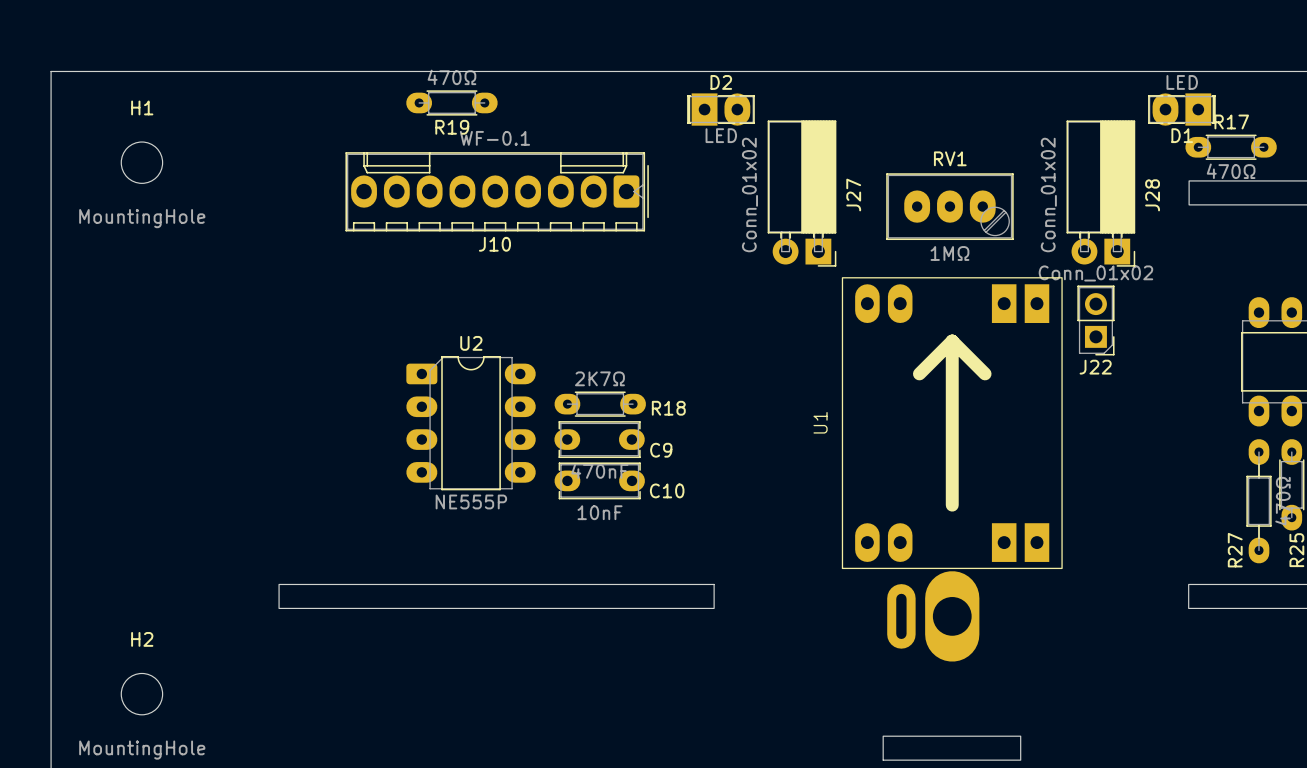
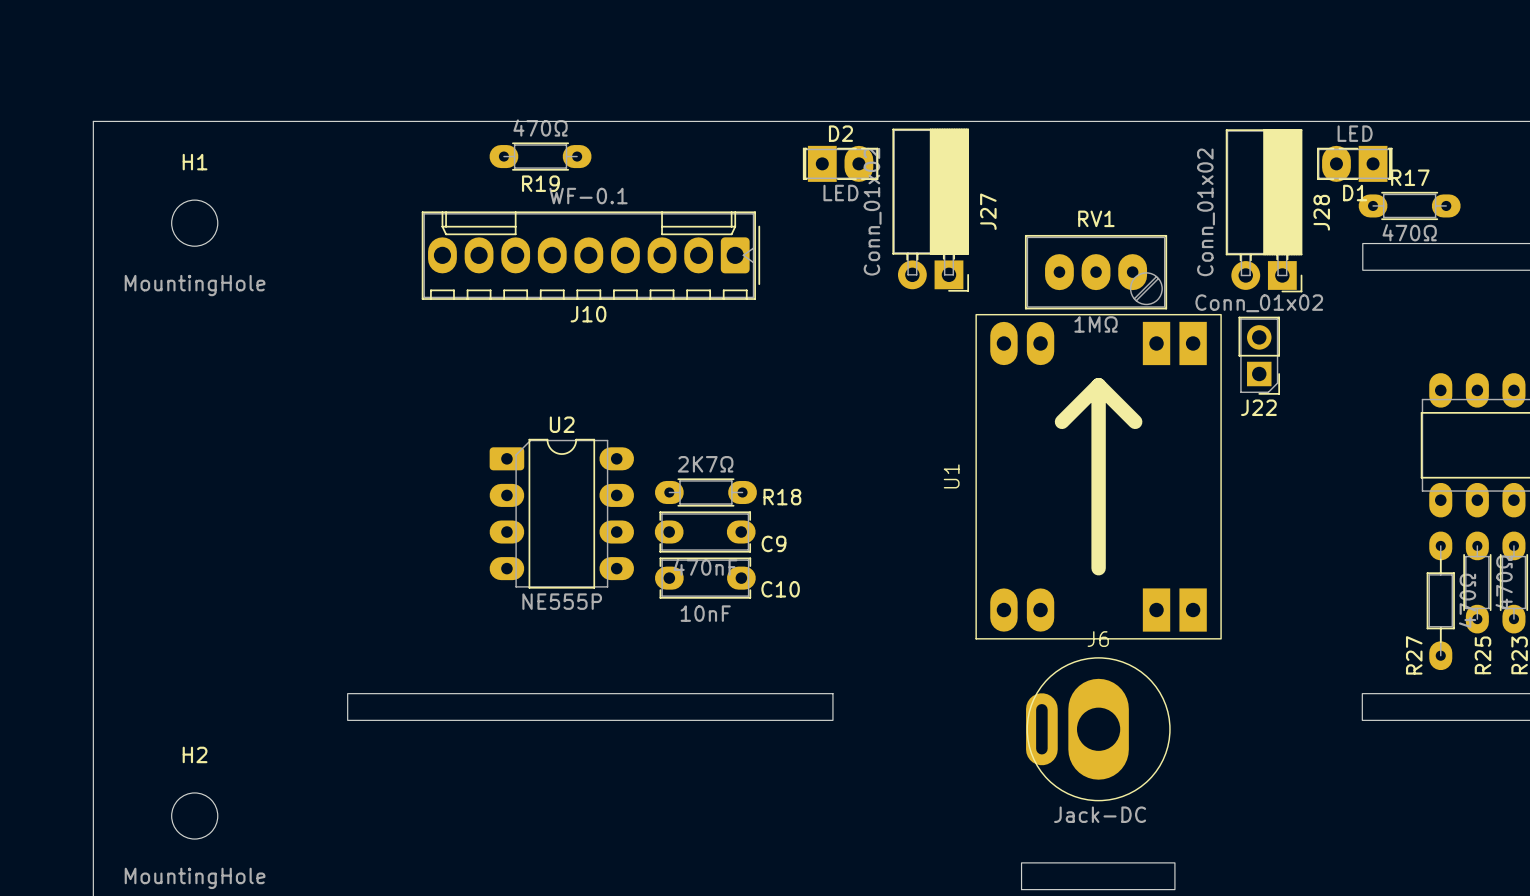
J27 position: (802, 193) -> (930, 210)
J28 position: (1100, 193) -> (1264, 210)
J22 position: (1095, 320) -> (1259, 355)
U1 position: (952, 423) -> (1098, 476)
J6 side: bottom (933, 616) -> top (1098, 729)

